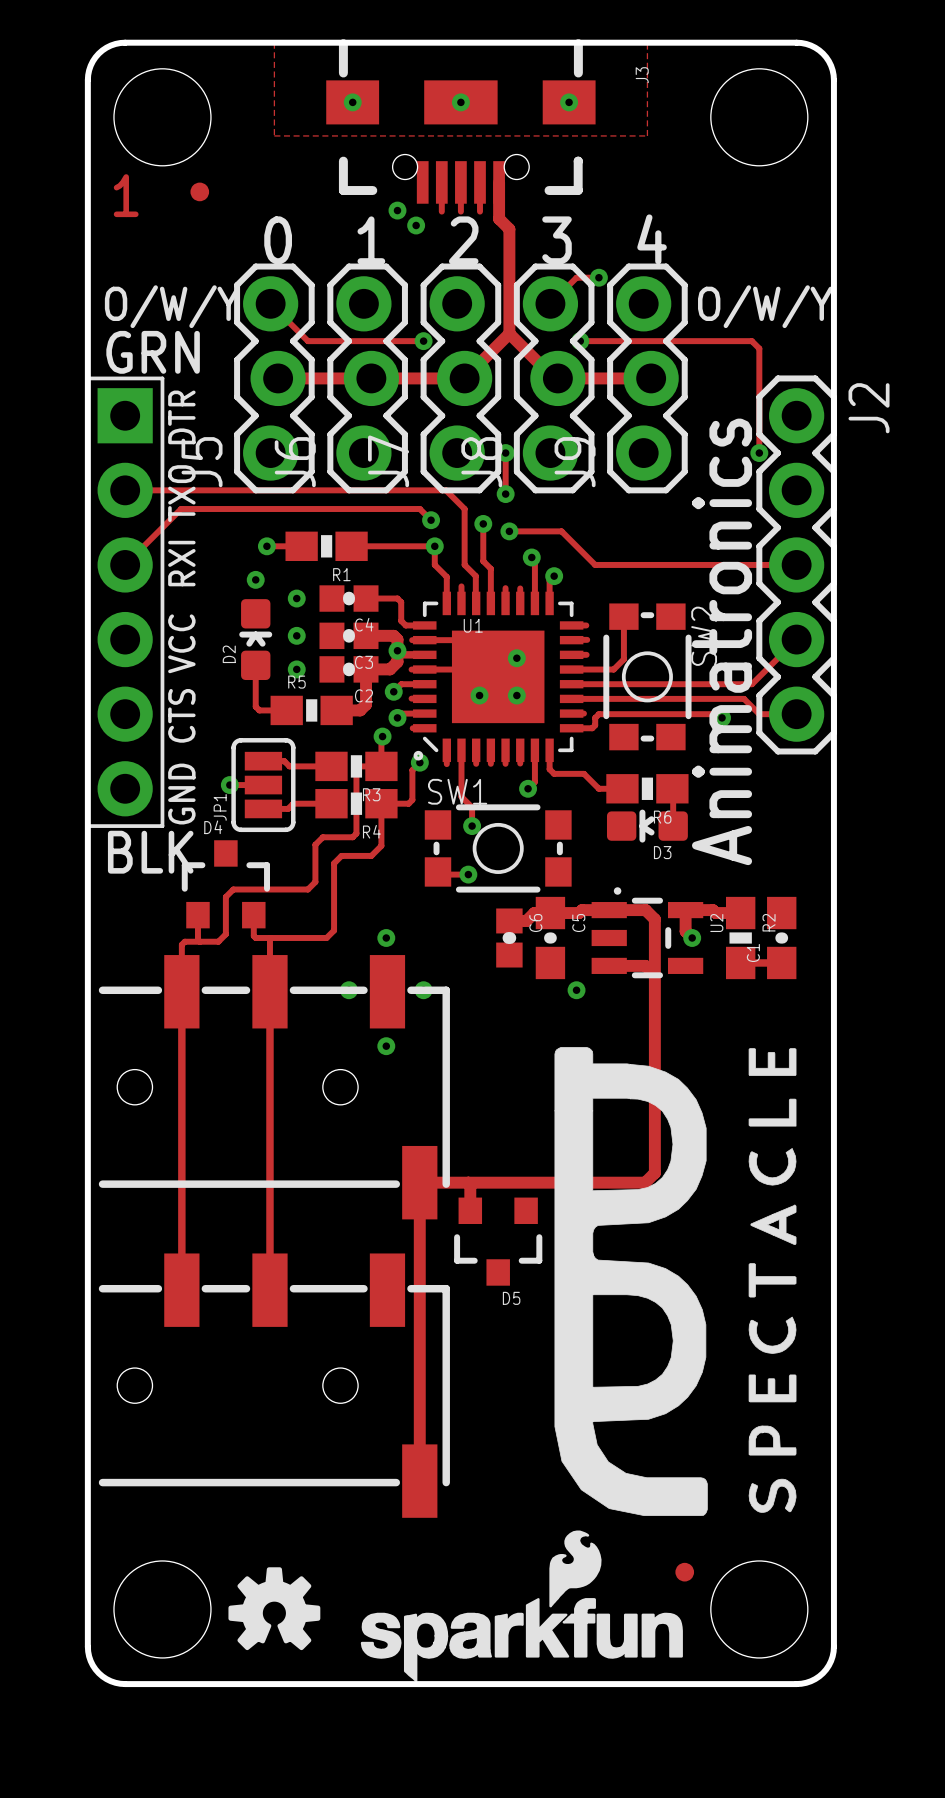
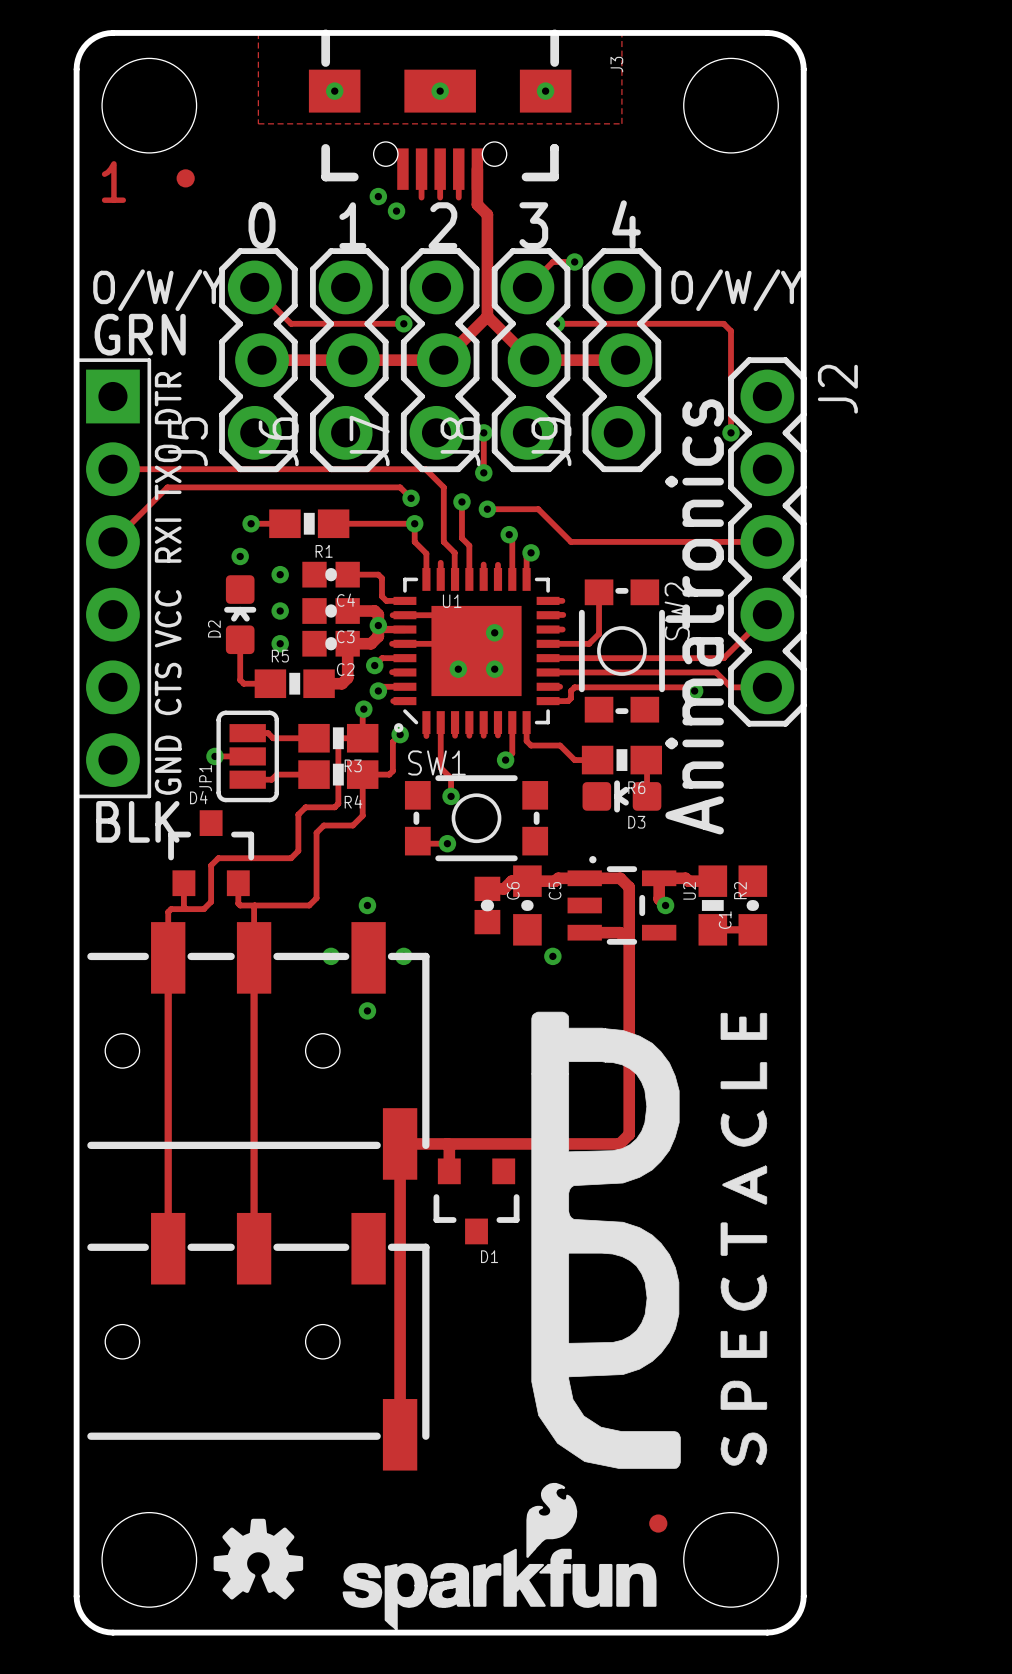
D5 name: D5 (511, 1298) -> D1 (489, 1256)

